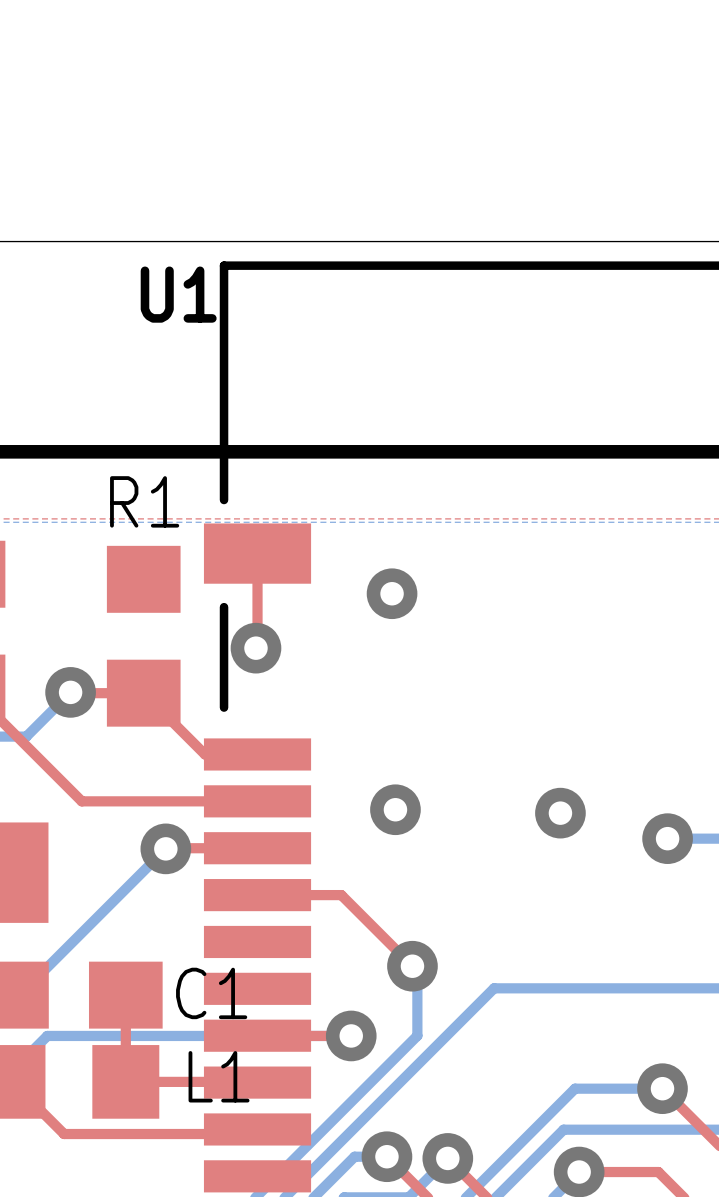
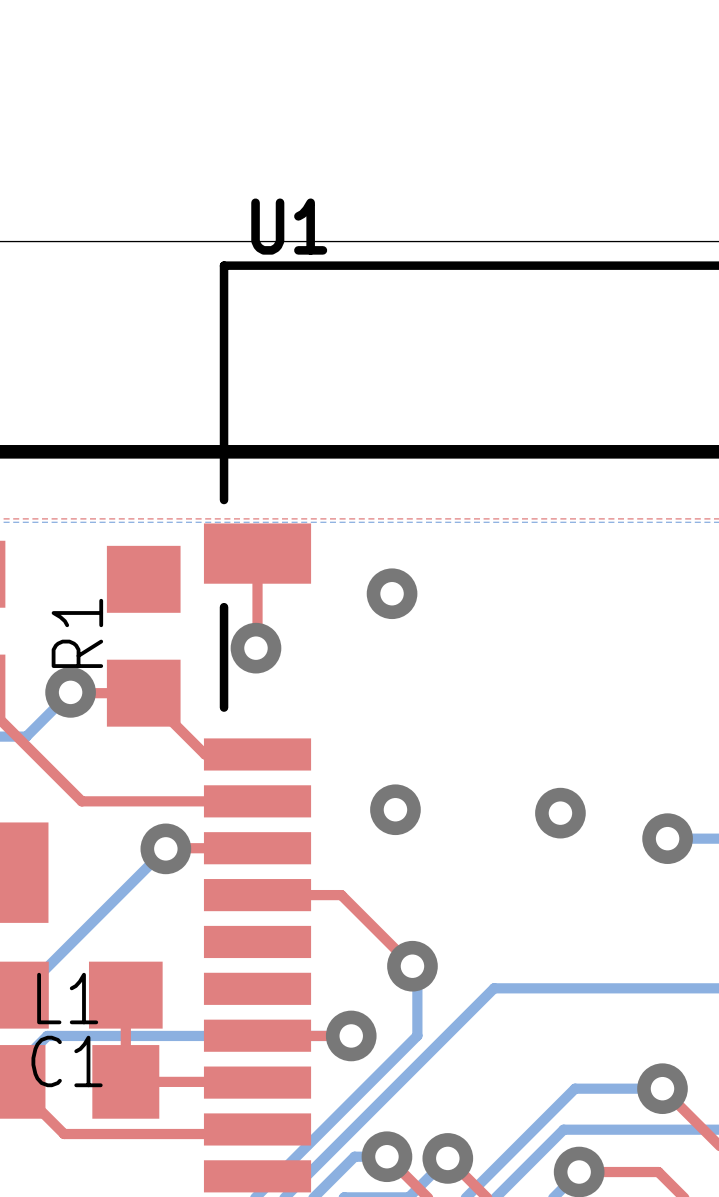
U1 name position: U1 (178, 294) -> U1 (289, 226)
R1 name rotation: 0° (144, 501) -> 90° counterclockwise (77, 633)
R1 name position: R1 (144, 501) -> R1 (77, 633)
C1 name position: C1 (211, 993) -> C1 (67, 1061)
L1 name position: L1 (219, 1076) -> L1 (67, 998)

